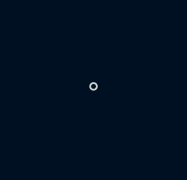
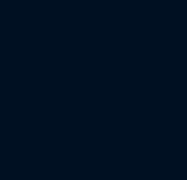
round board edge: [90, 83, 97, 90] -> none

